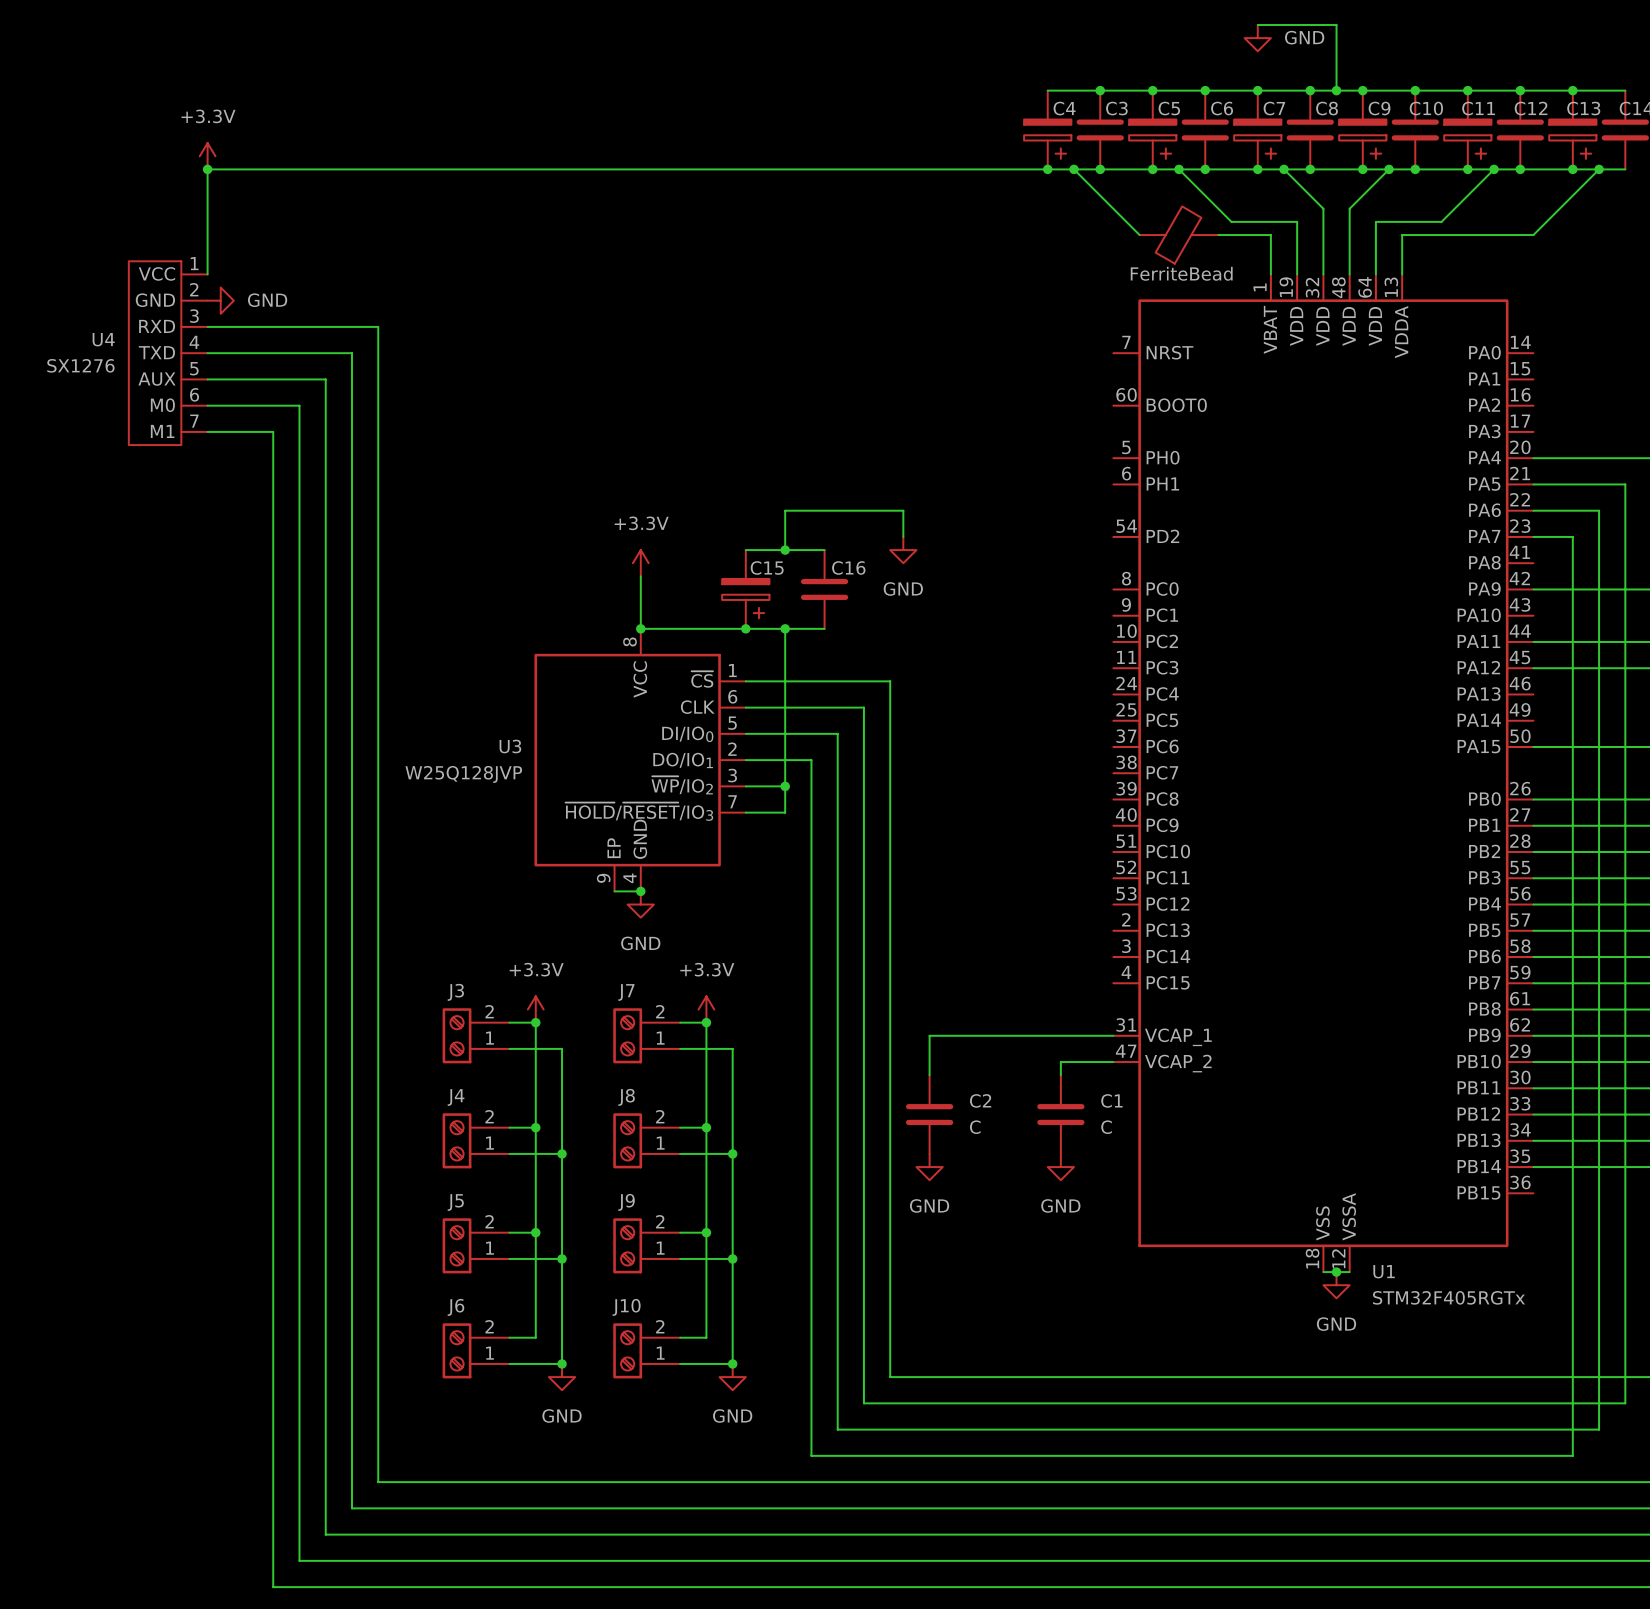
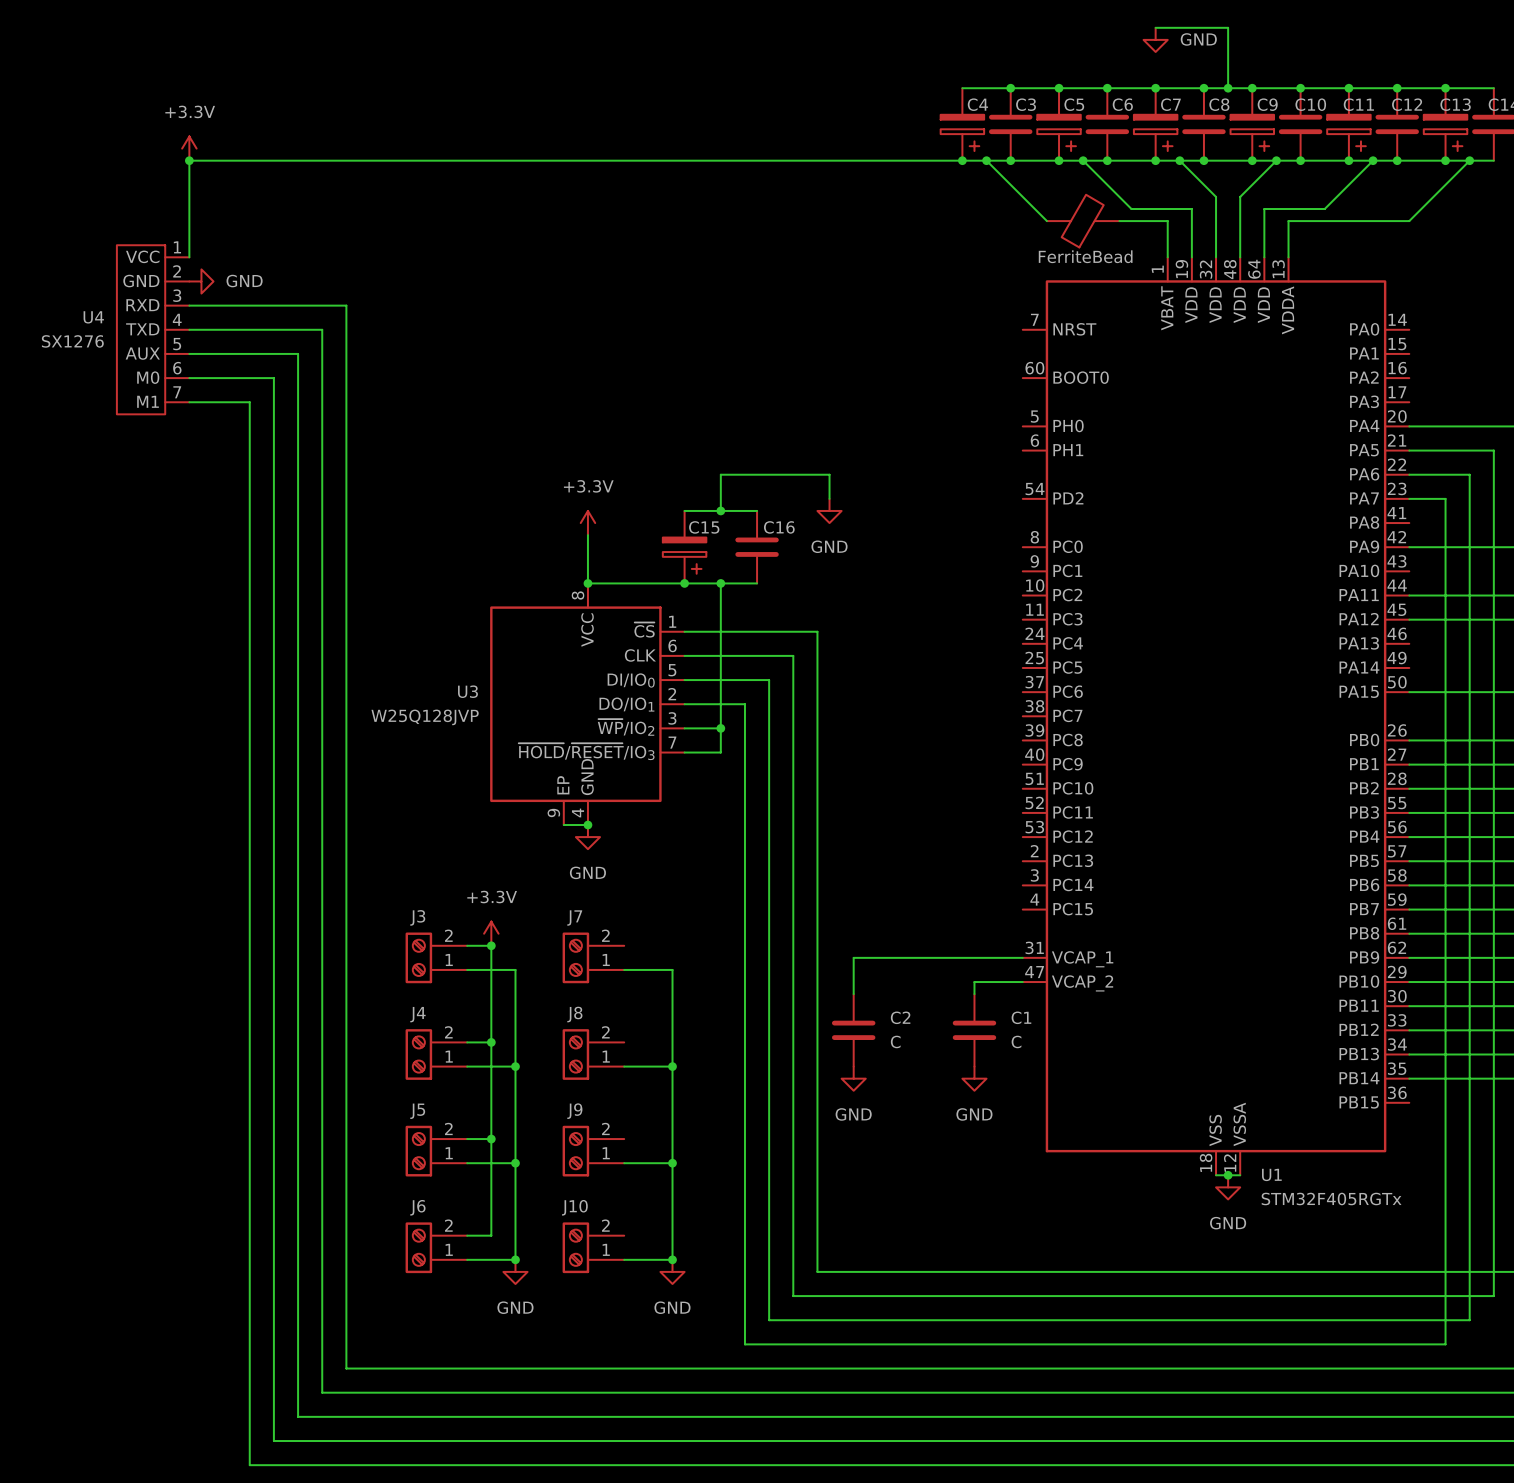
power symbol: +3.3V (706, 1009) -> none
wire: (680, 1022) (706, 1022) (706, 1337) (680, 1337) -> none
junction: (706, 1022) -> none
wire: (680, 1127) (706, 1127) -> none
junction: (706, 1127) -> none
wire: (680, 1232) (706, 1232) -> none
junction: (706, 1232) -> none

